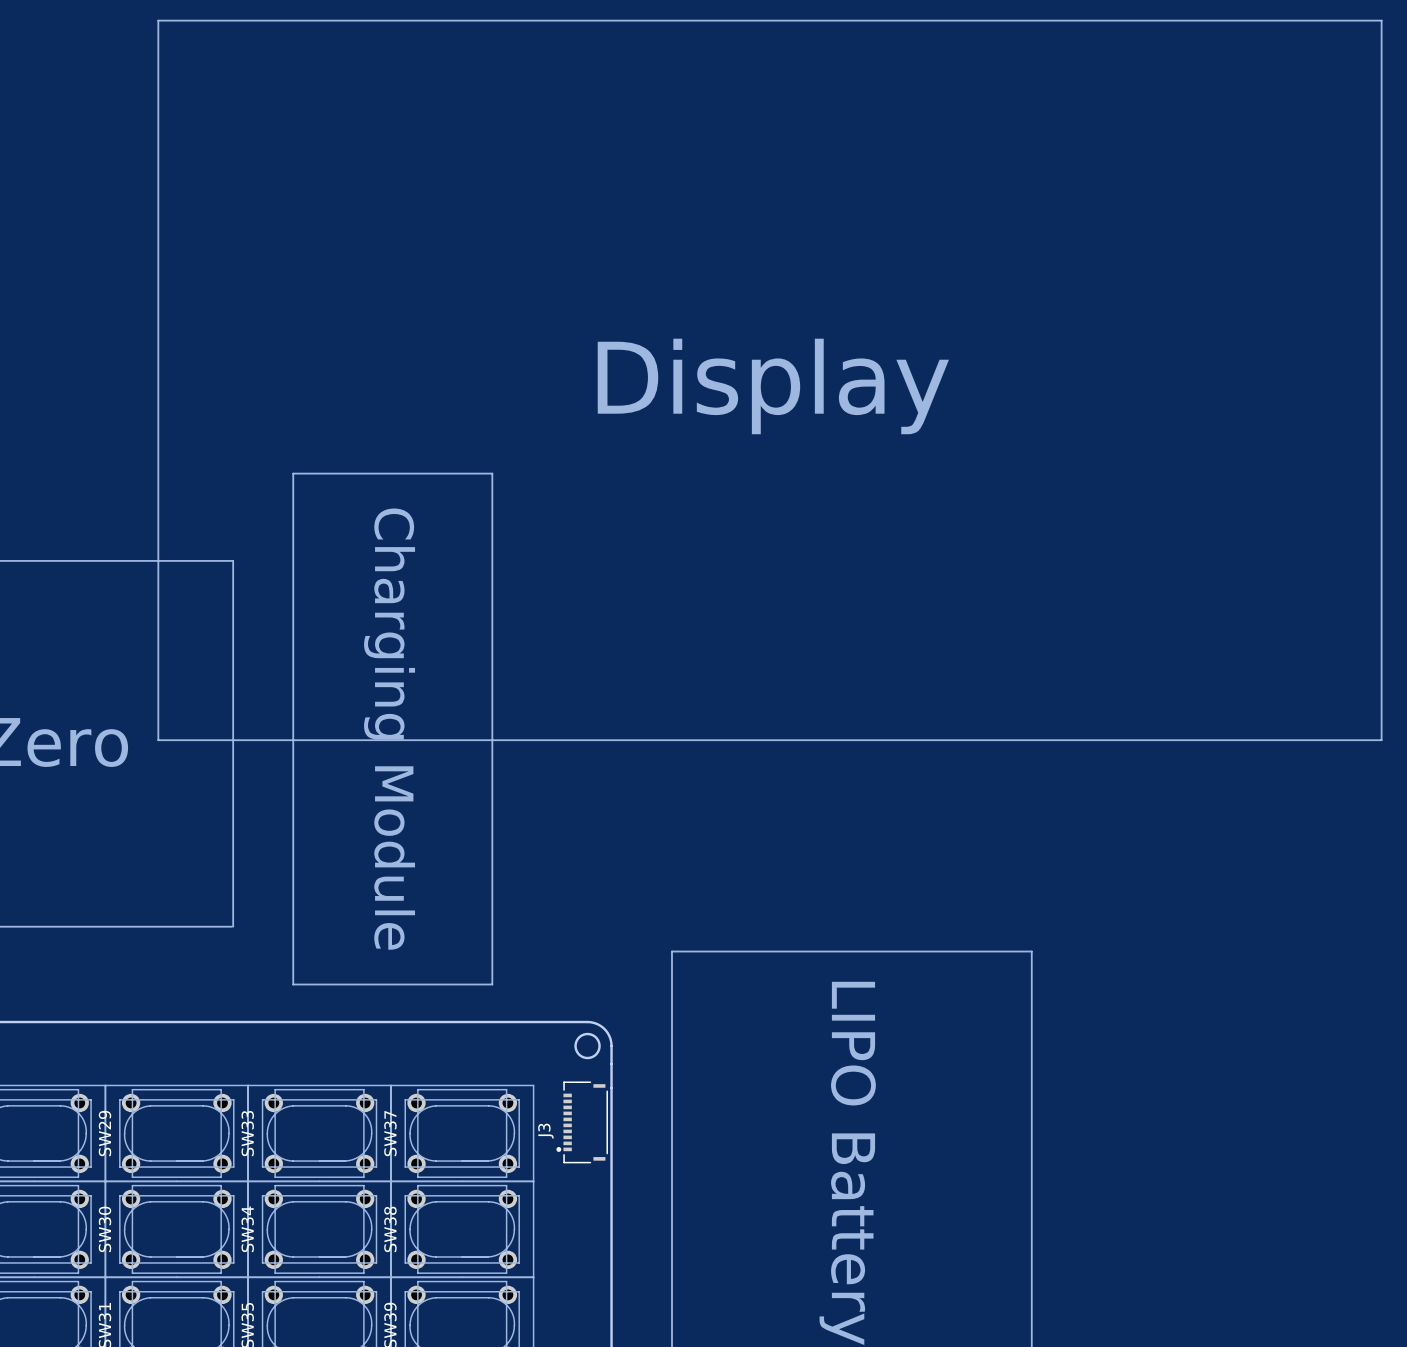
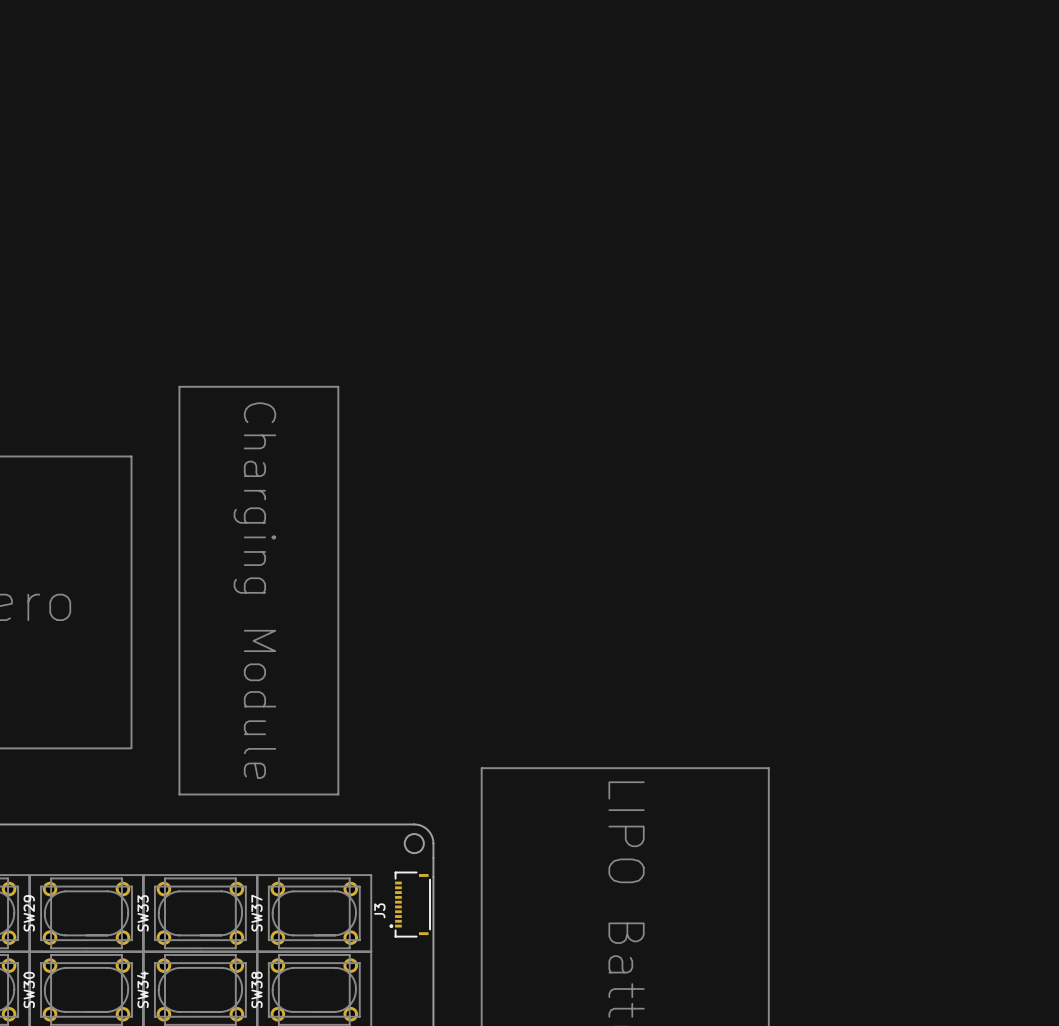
line: (158, 20) (158, 740) (1381, 740) (1381, 20) (158, 20) -> none
text: Display (773, 386) -> none

